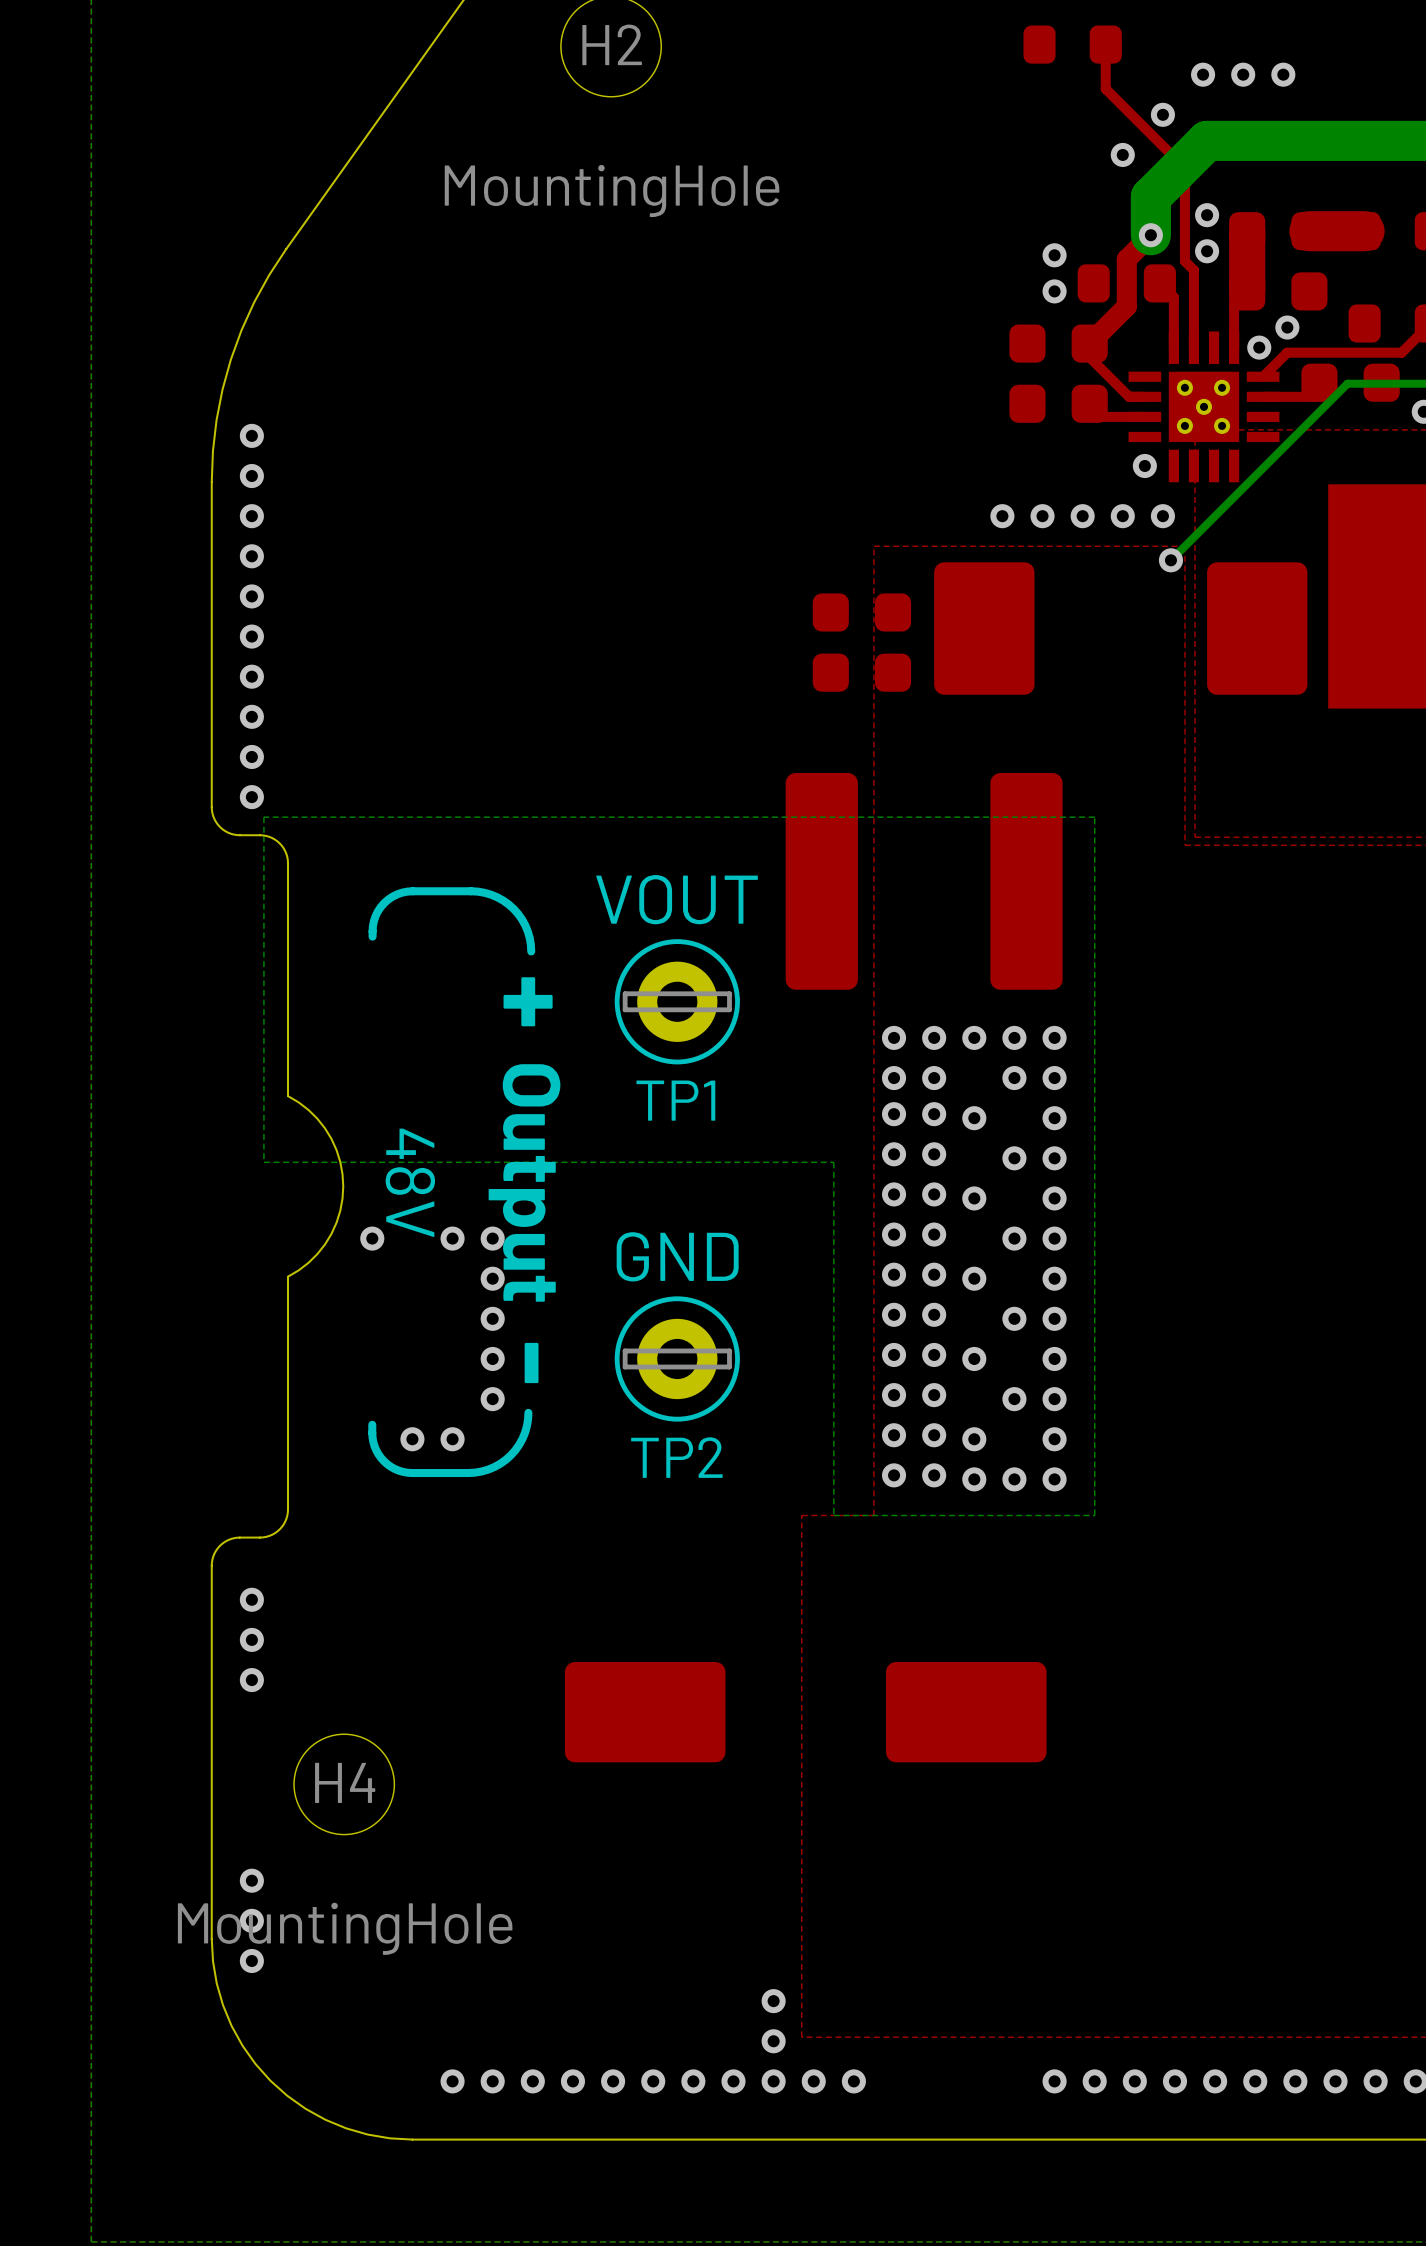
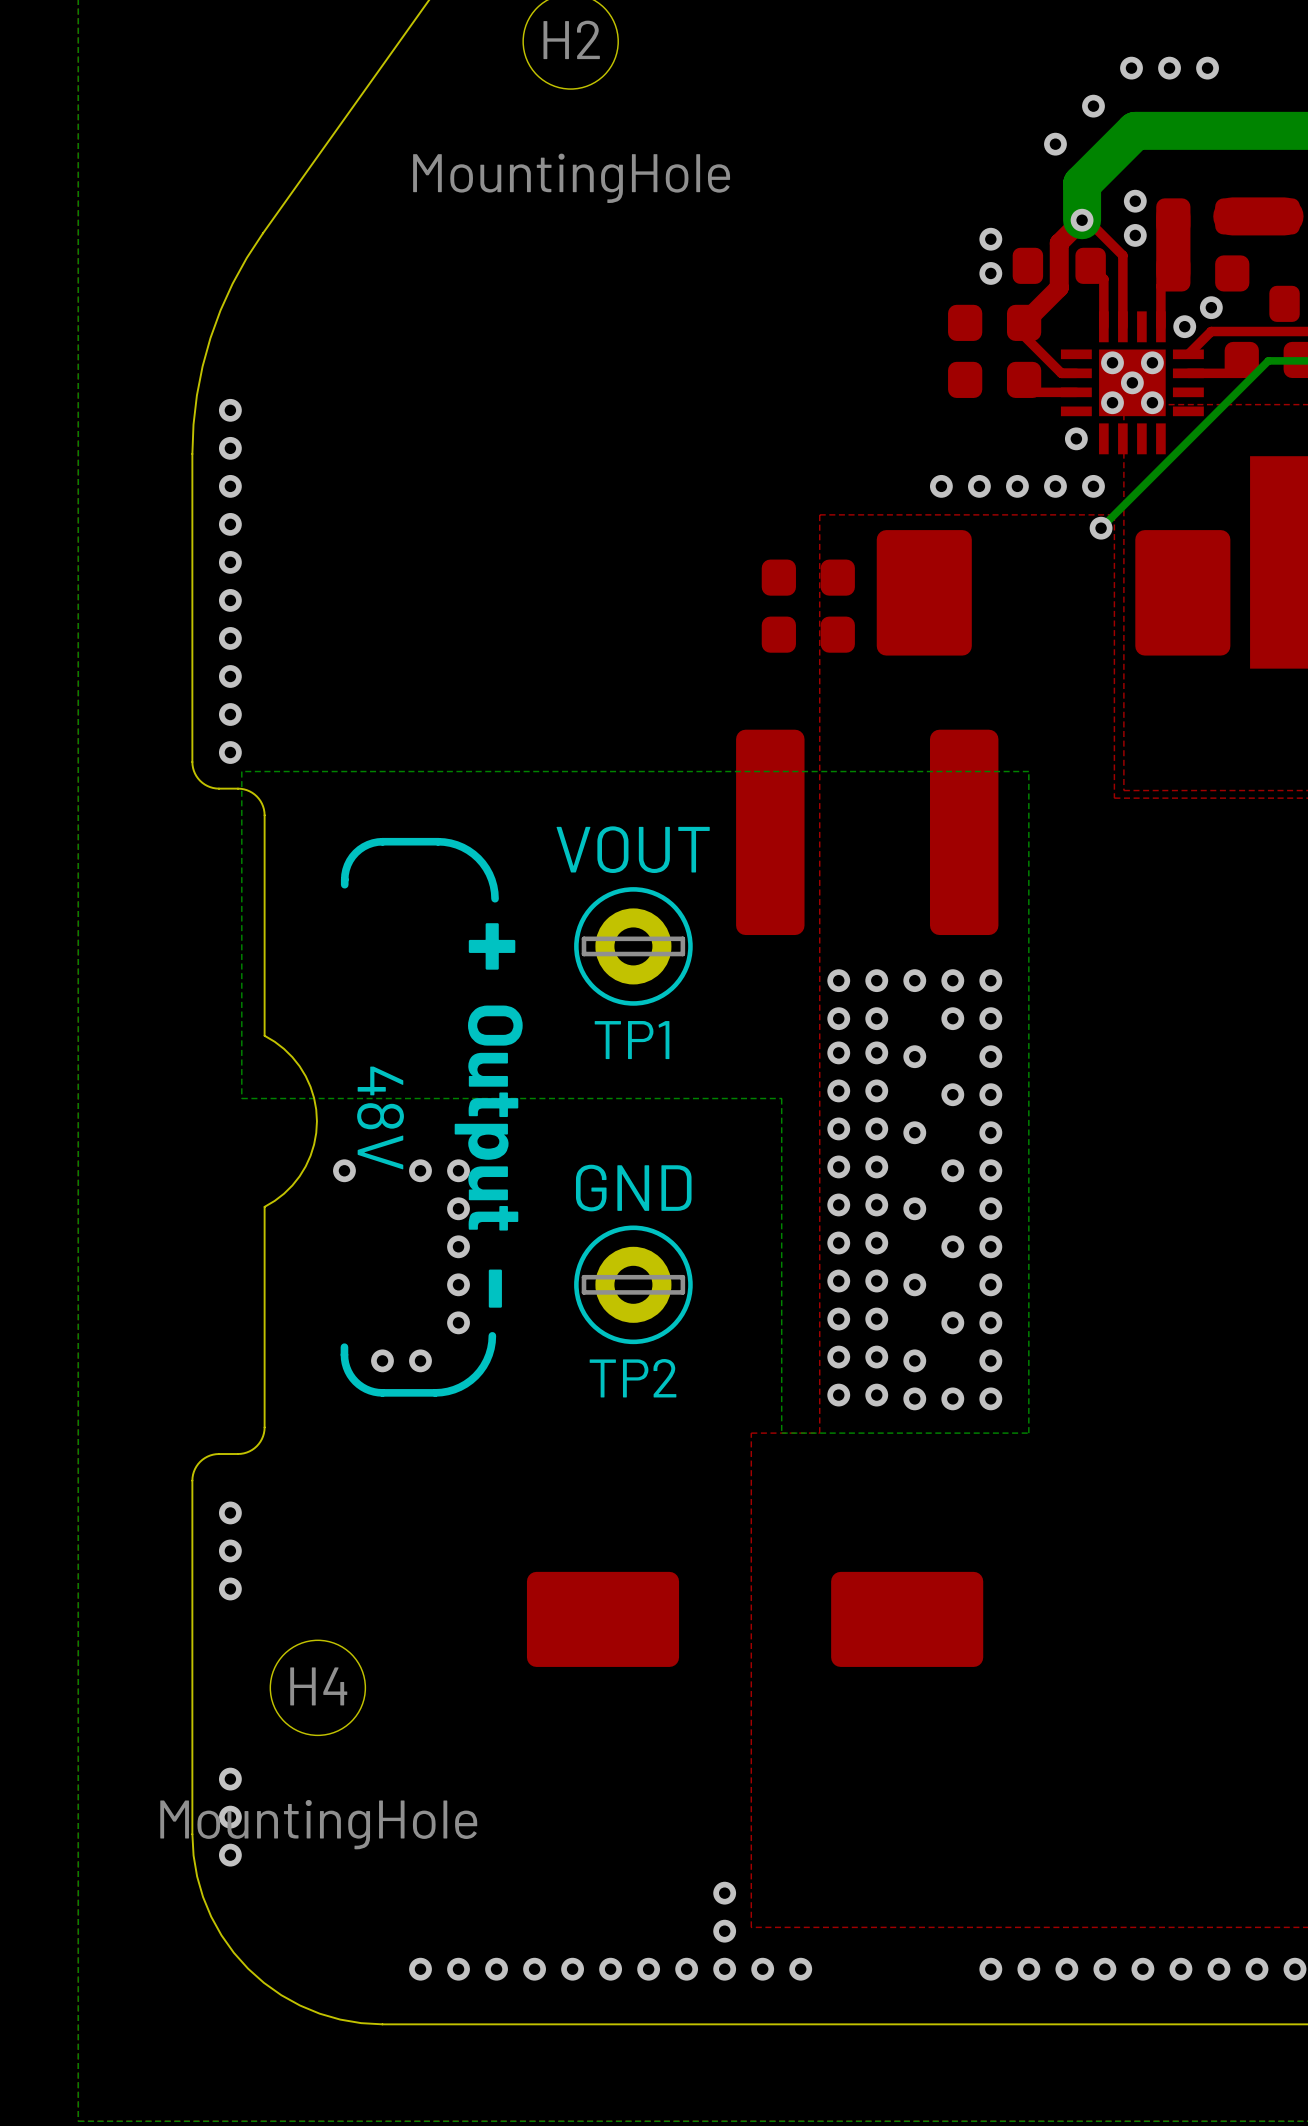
part: (1072, 44) -> none
top track: (1105, 47) (1105, 88) (1186, 169) (1184, 261) (1193, 272) -> (1087, 220) (1122, 255)
part footprint: [1128, 331, 1280, 483] -> [1060, 311, 1204, 455]
via: none -> (1112, 362)
via: none -> (1152, 362)
via: none -> (1132, 382)
via: none -> (1112, 402)
via: none -> (1152, 402)

